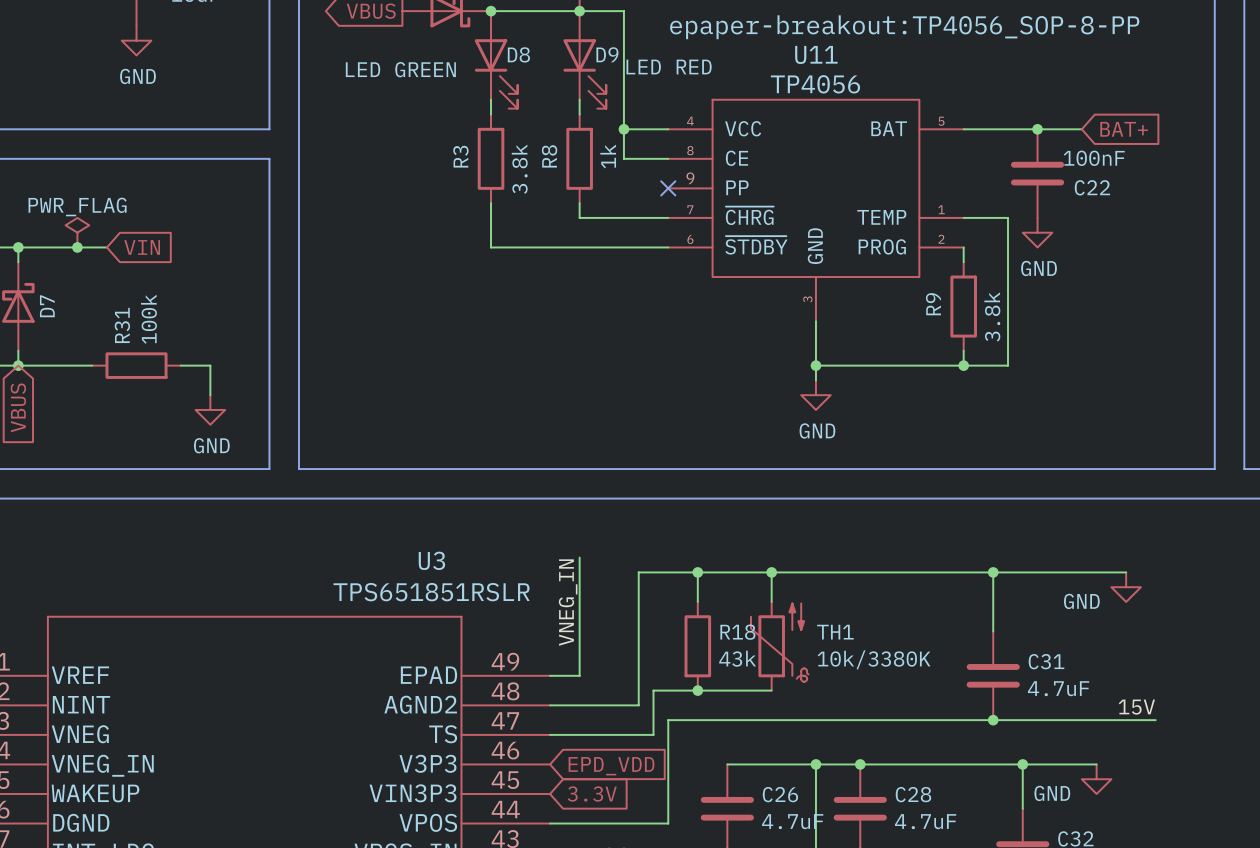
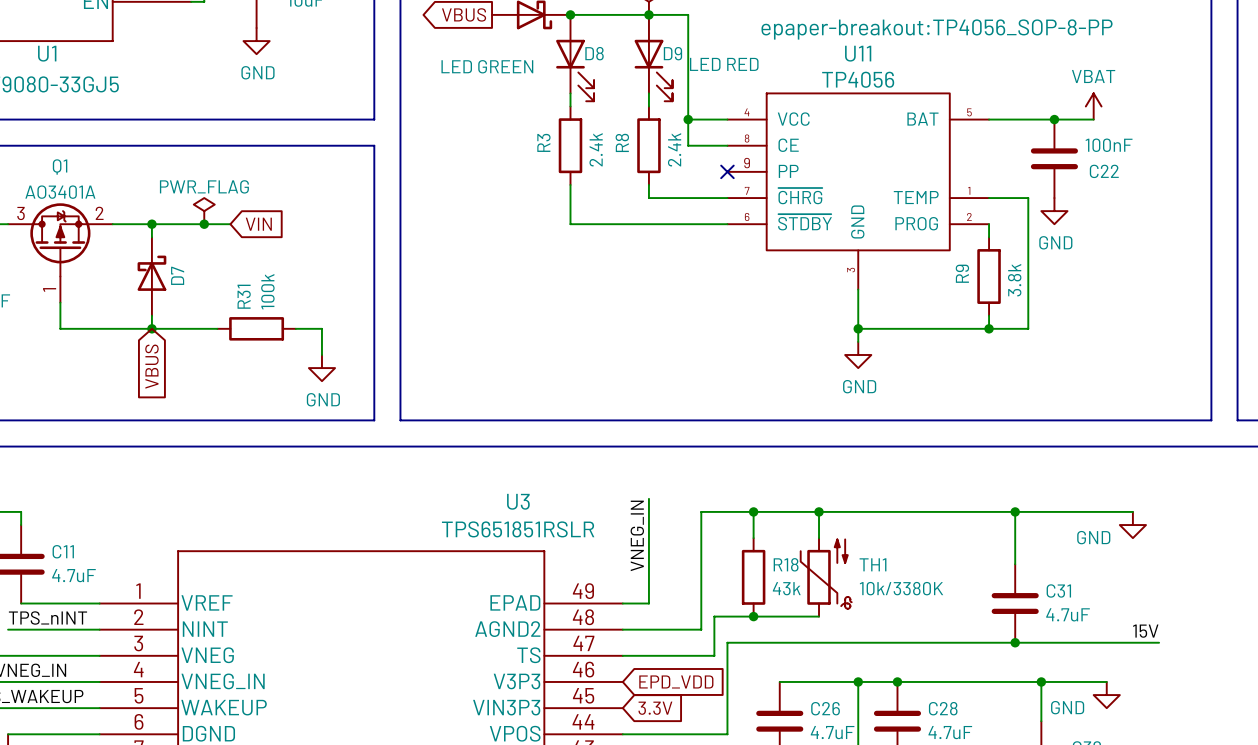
power symbol: none -> VBAT (1093, 106)
global label: BAT+ (1124, 129) -> none
R8 value: 1k (608, 156) -> 2.4k (674, 149)
R3 value: 3.8k (519, 169) -> 2.4k (596, 149)

